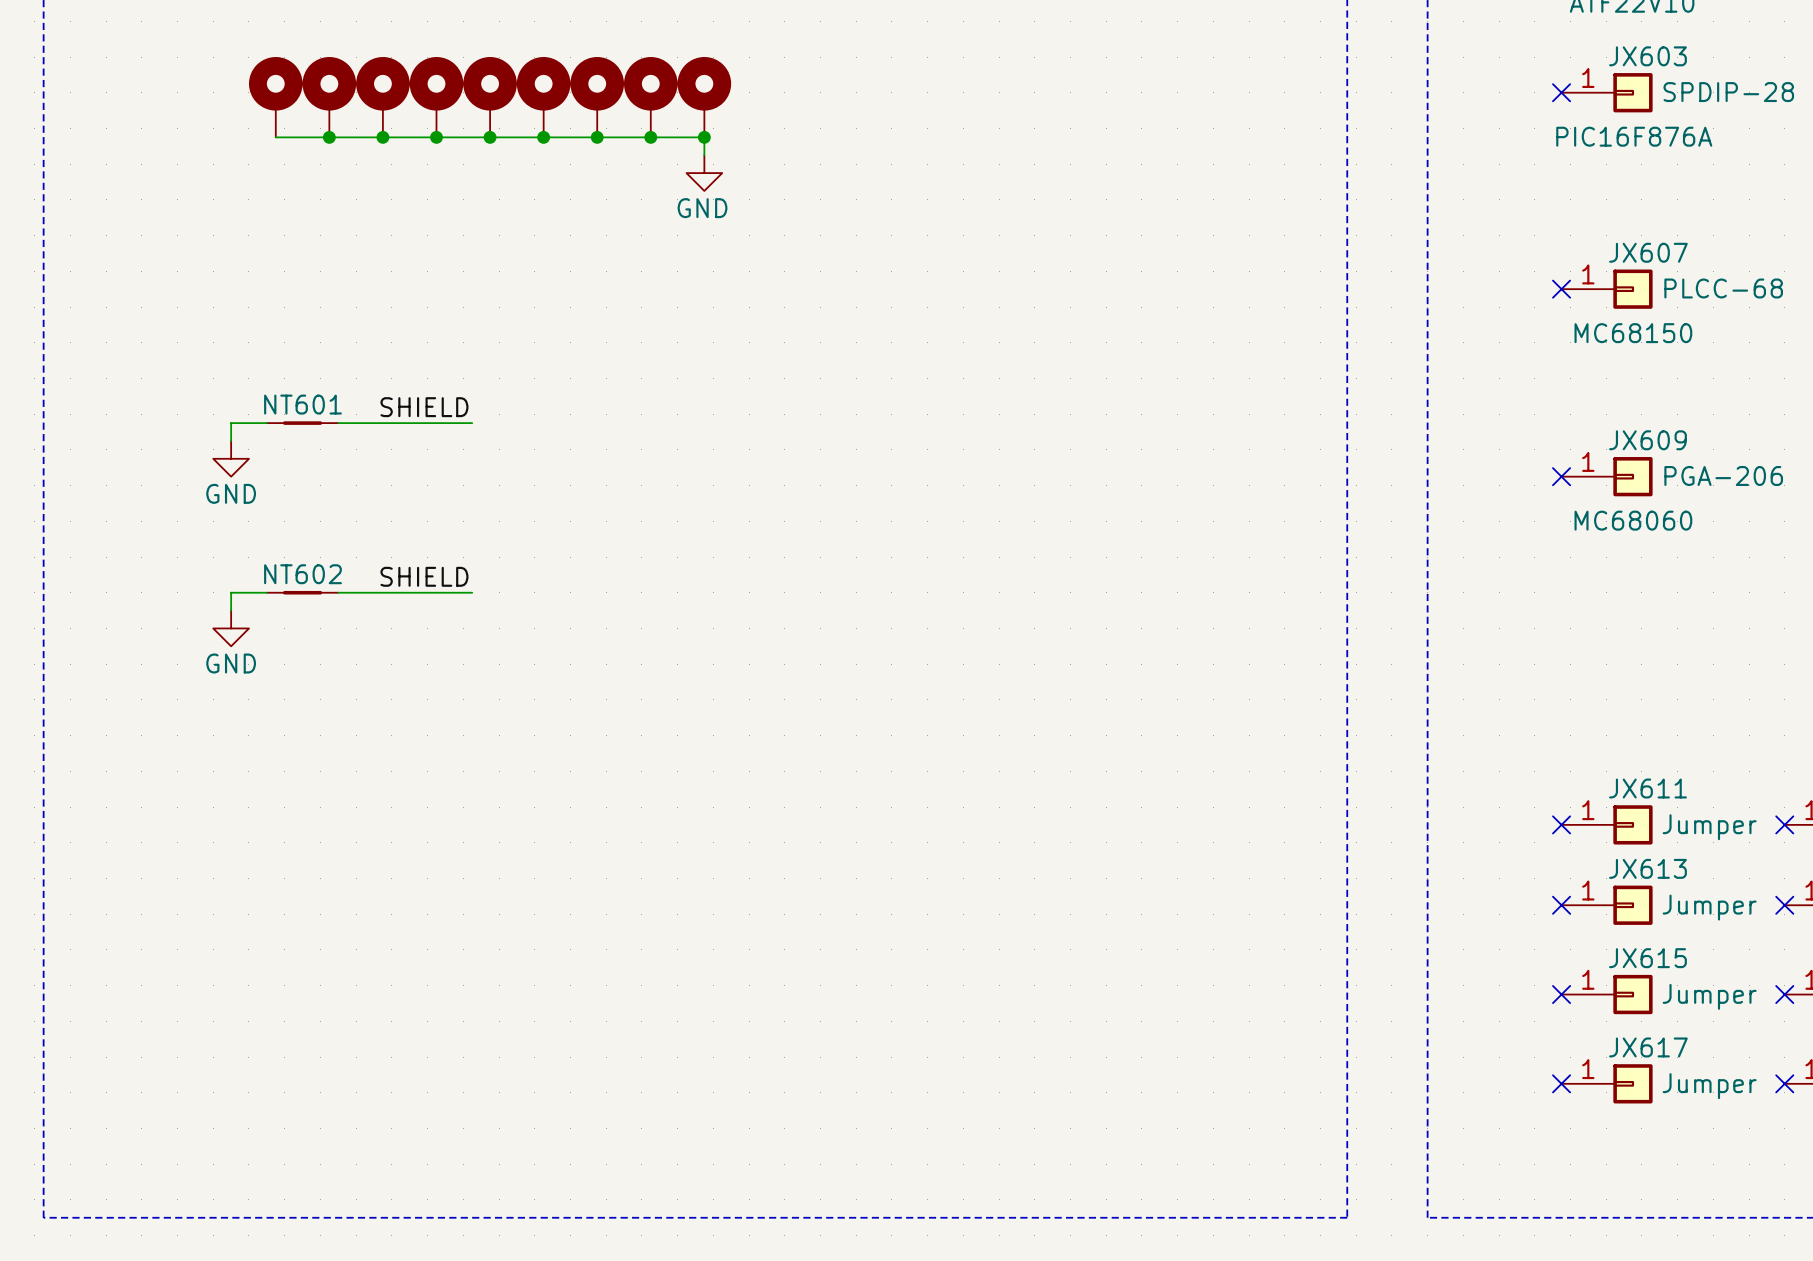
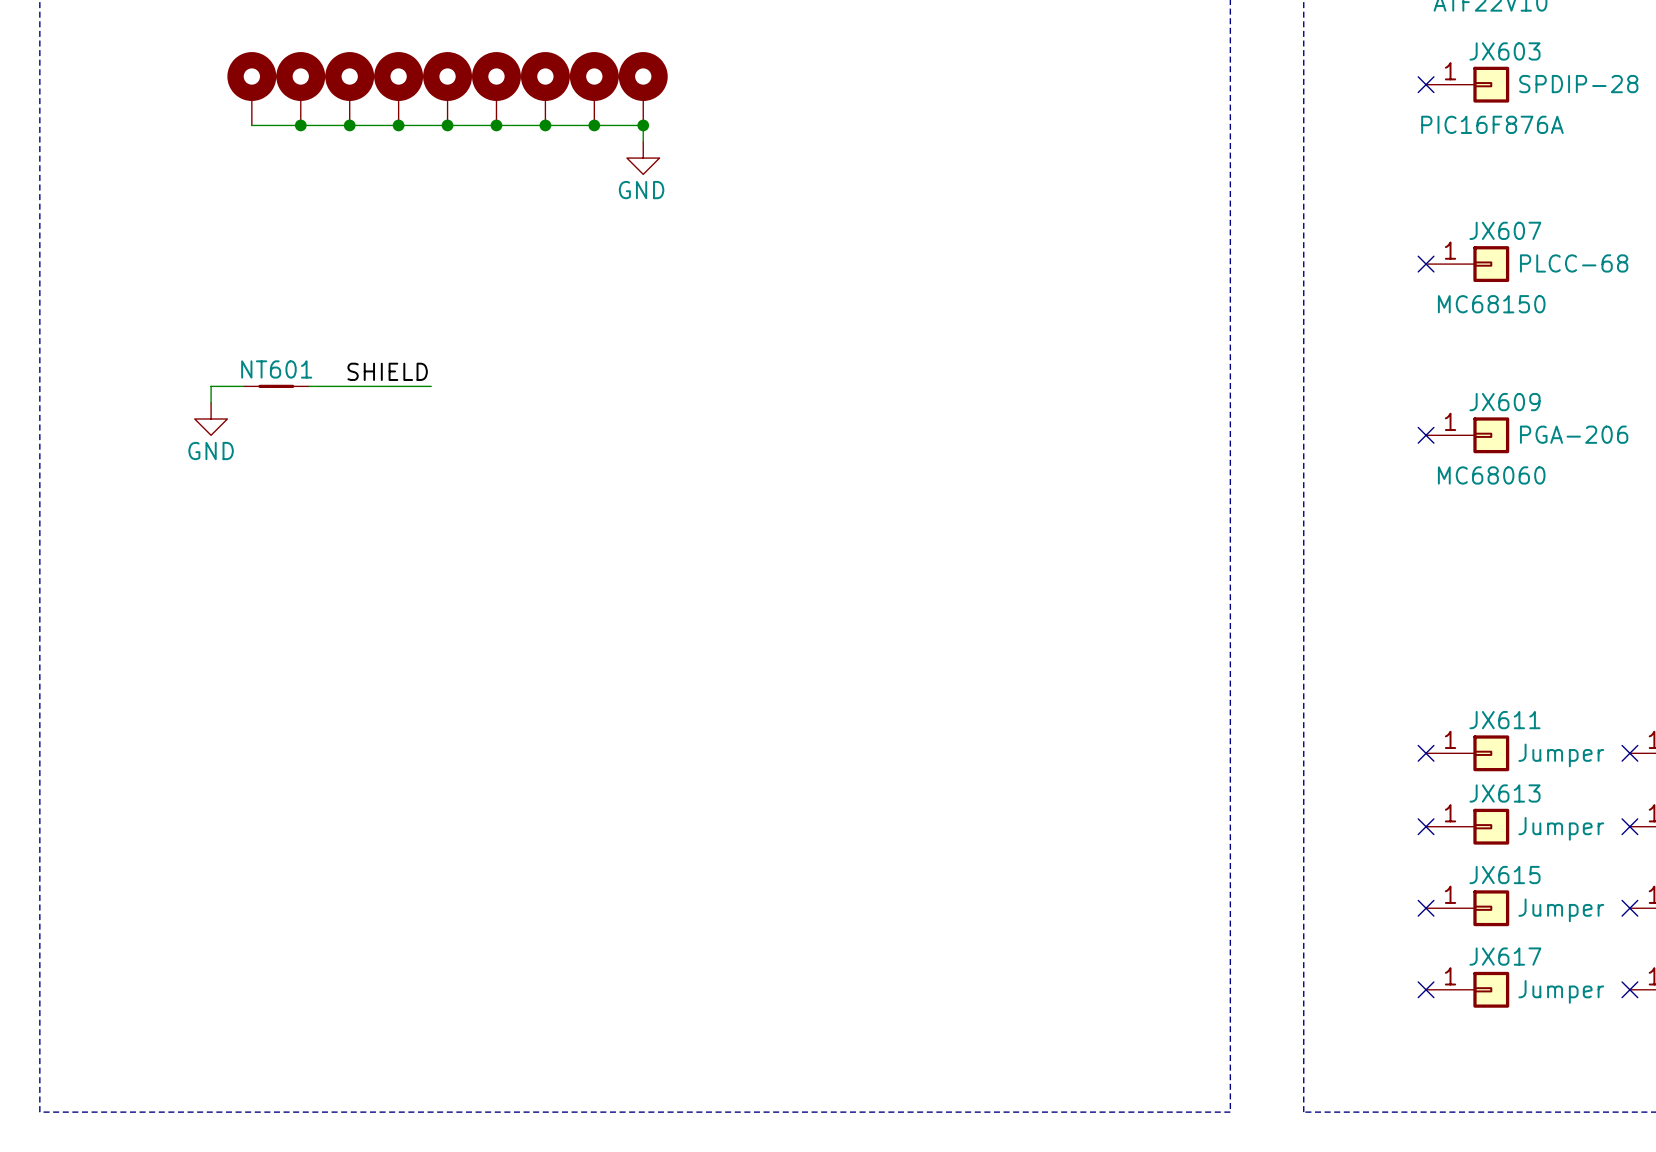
label: SHIELD (424, 576) -> none
wire: (266, 592) (231, 592) (231, 610) -> none
NT602: (302, 592) -> none
wire: (338, 592) (472, 592) -> none
power symbol: GND (231, 628) -> none

